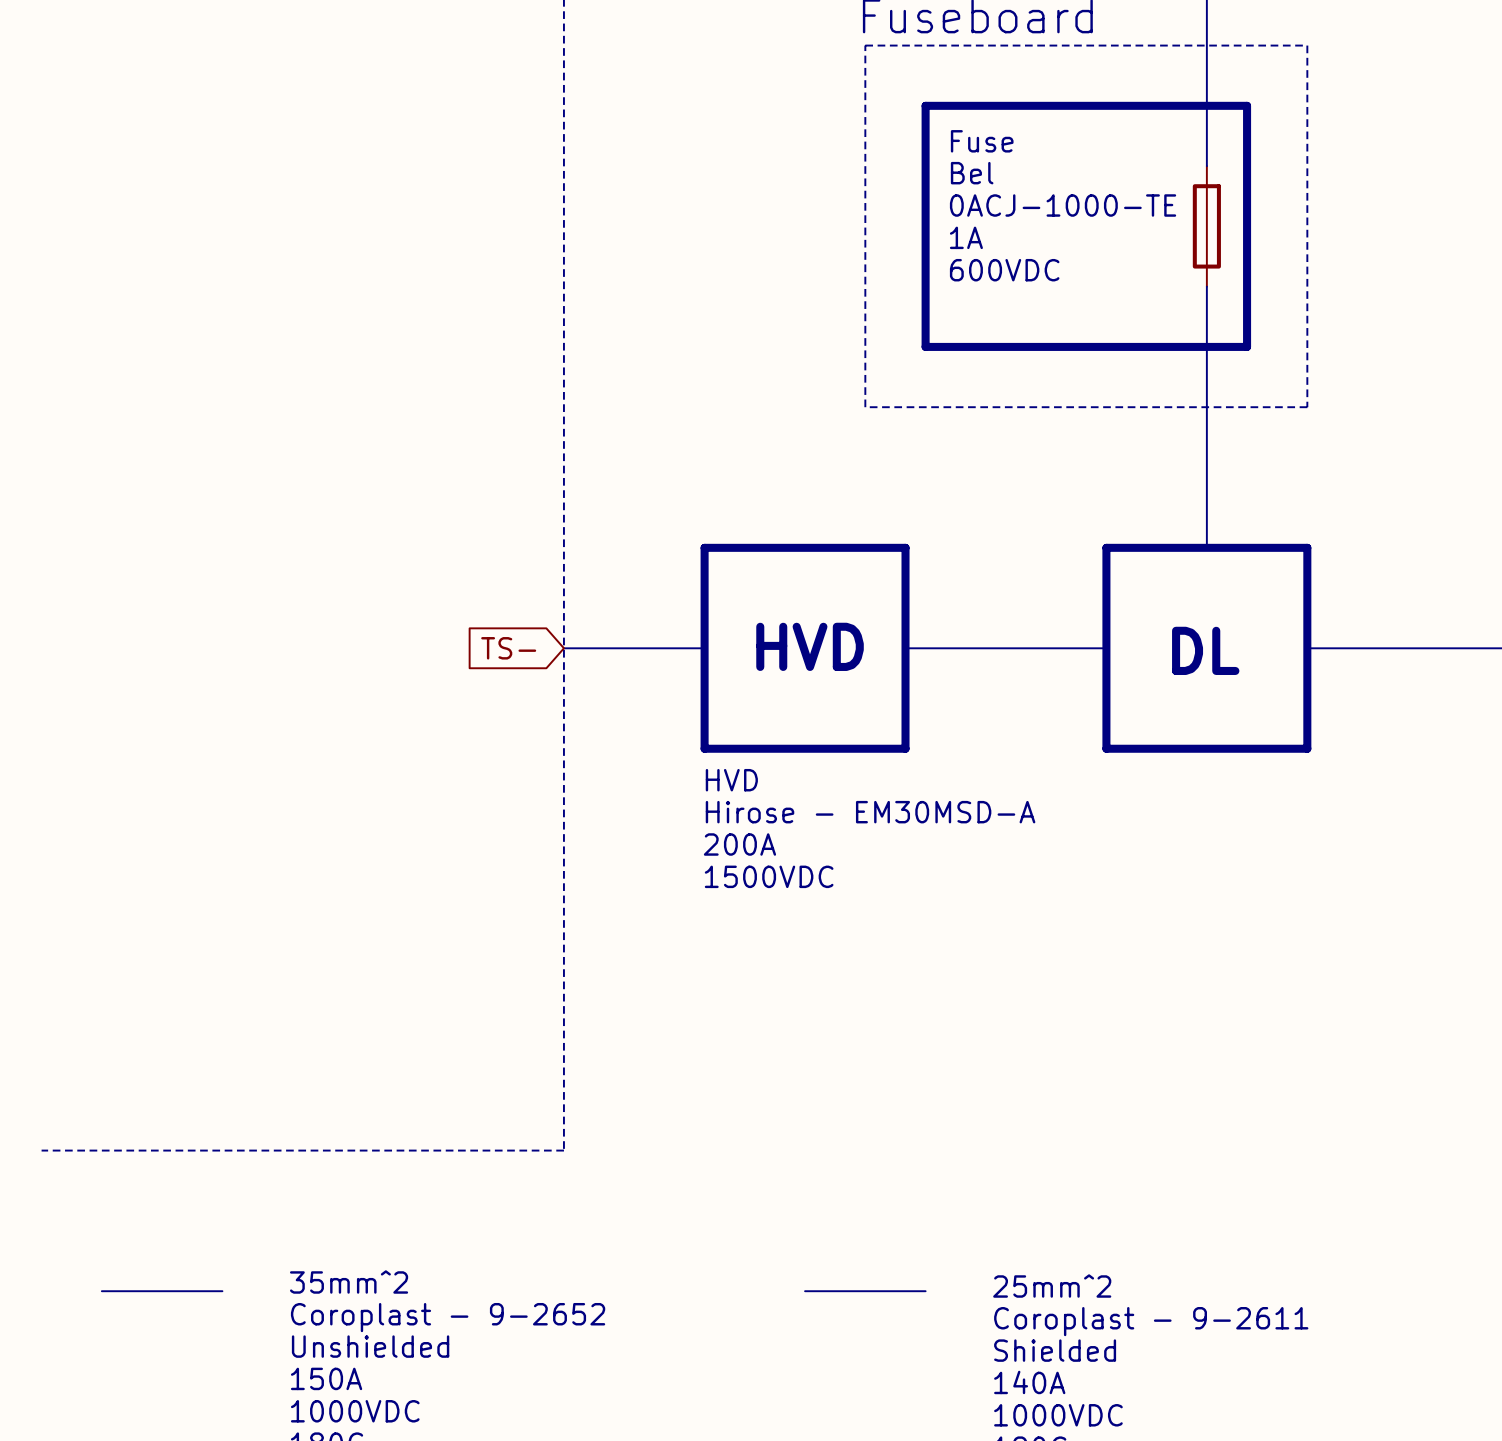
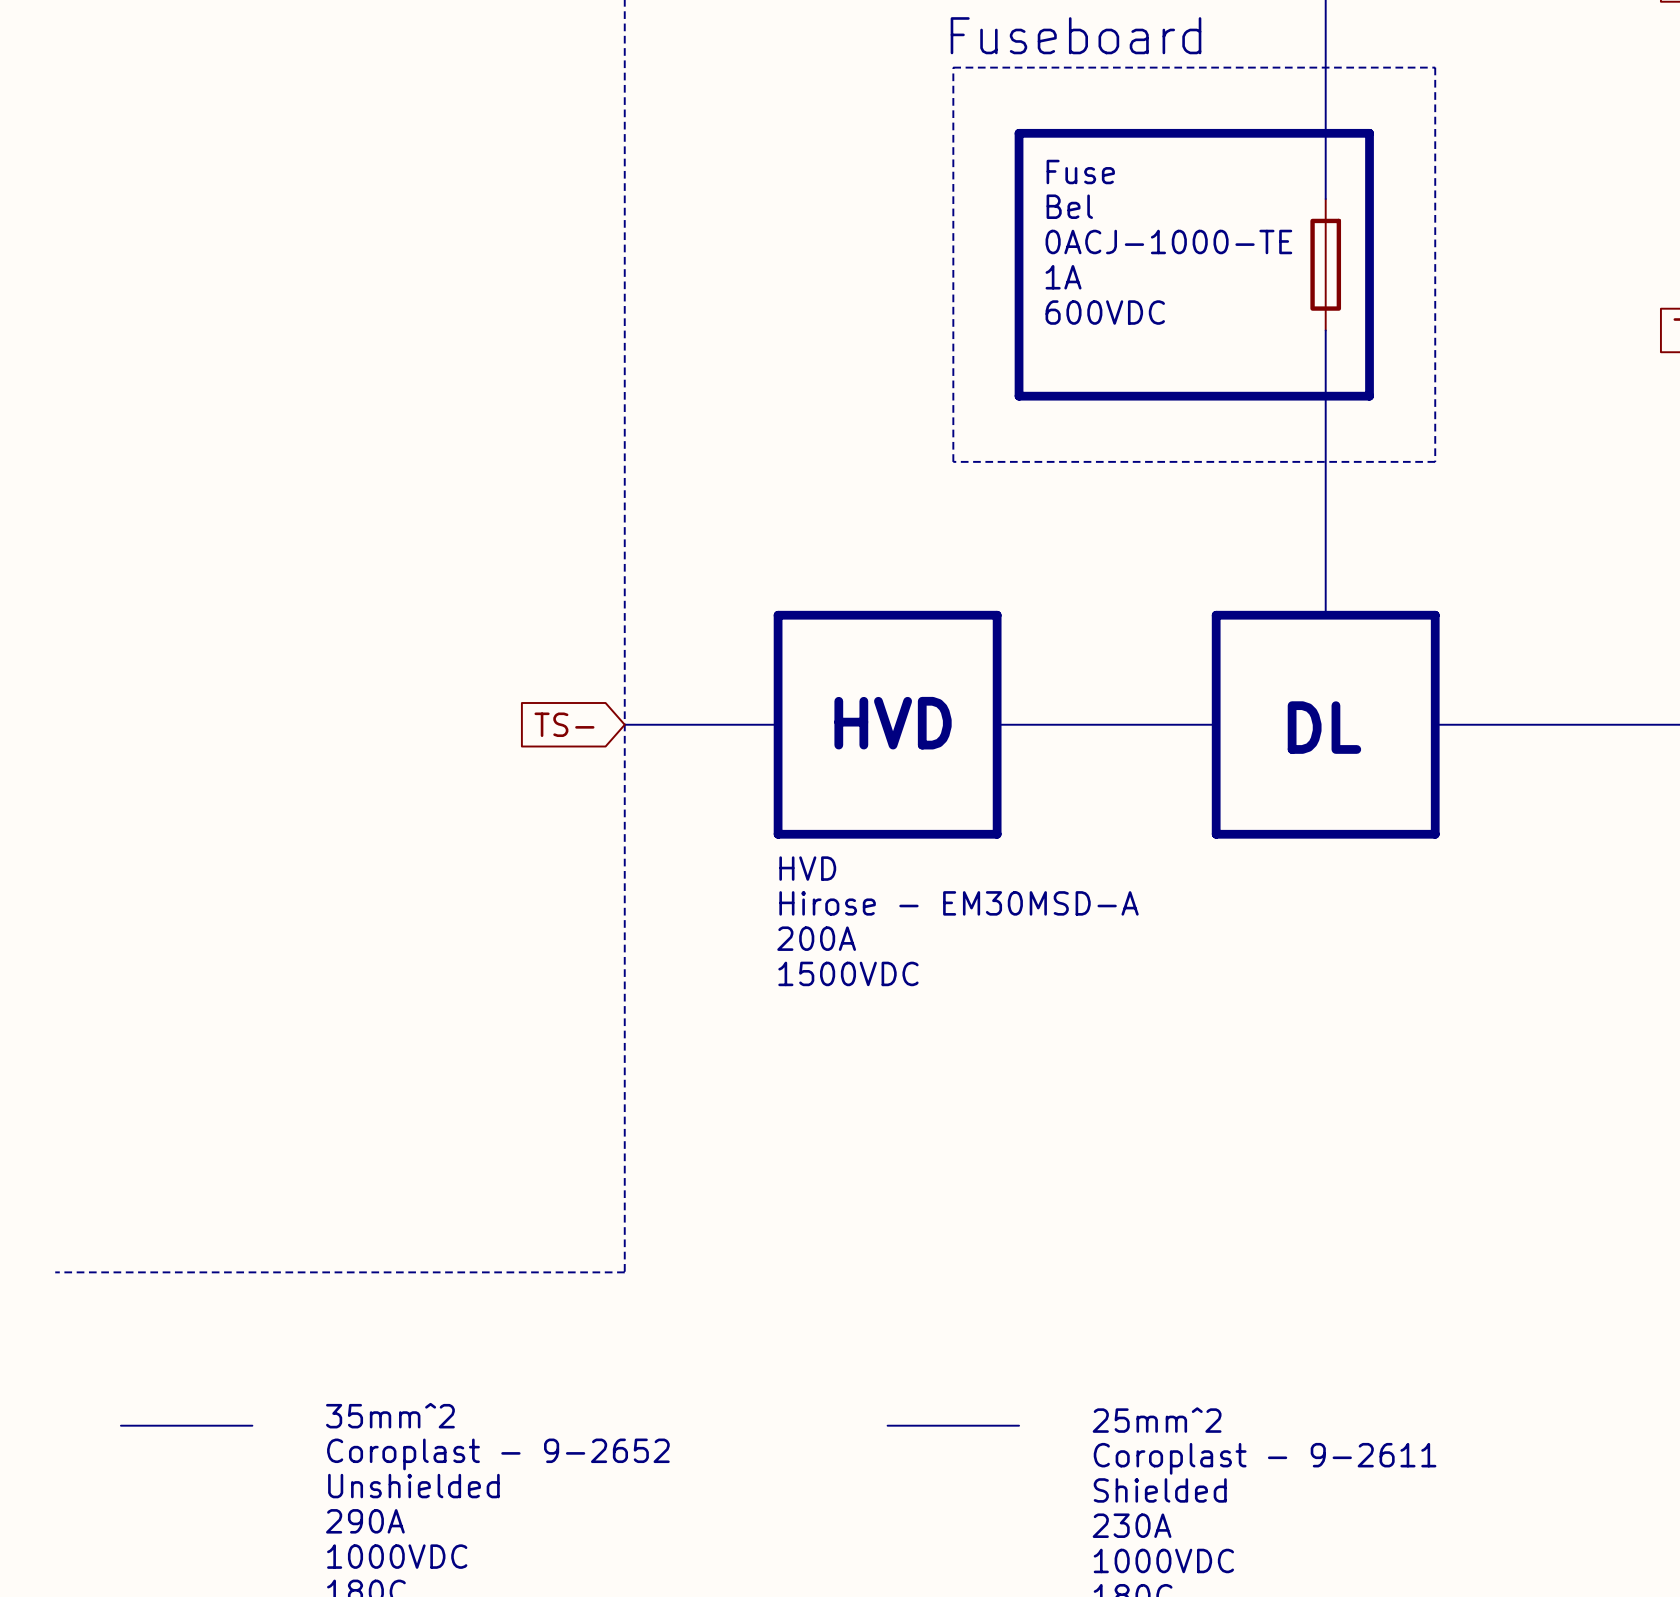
text: 150A (326, 1378) -> 290A (365, 1521)
text: 140A (1029, 1382) -> 230A (1132, 1525)

